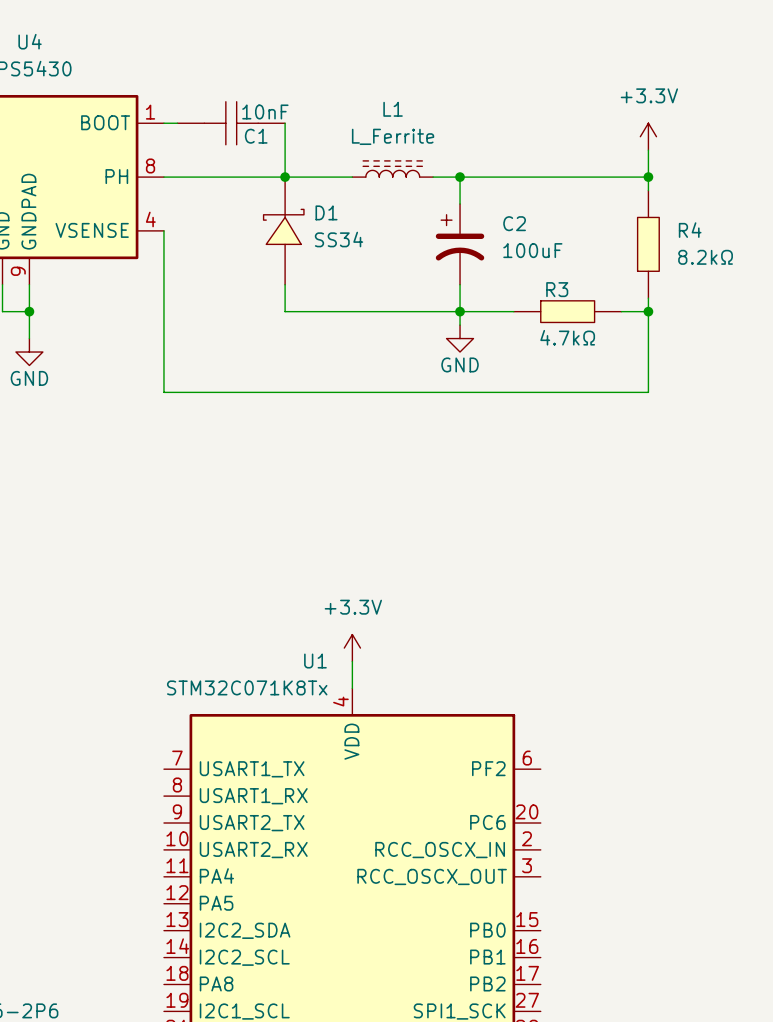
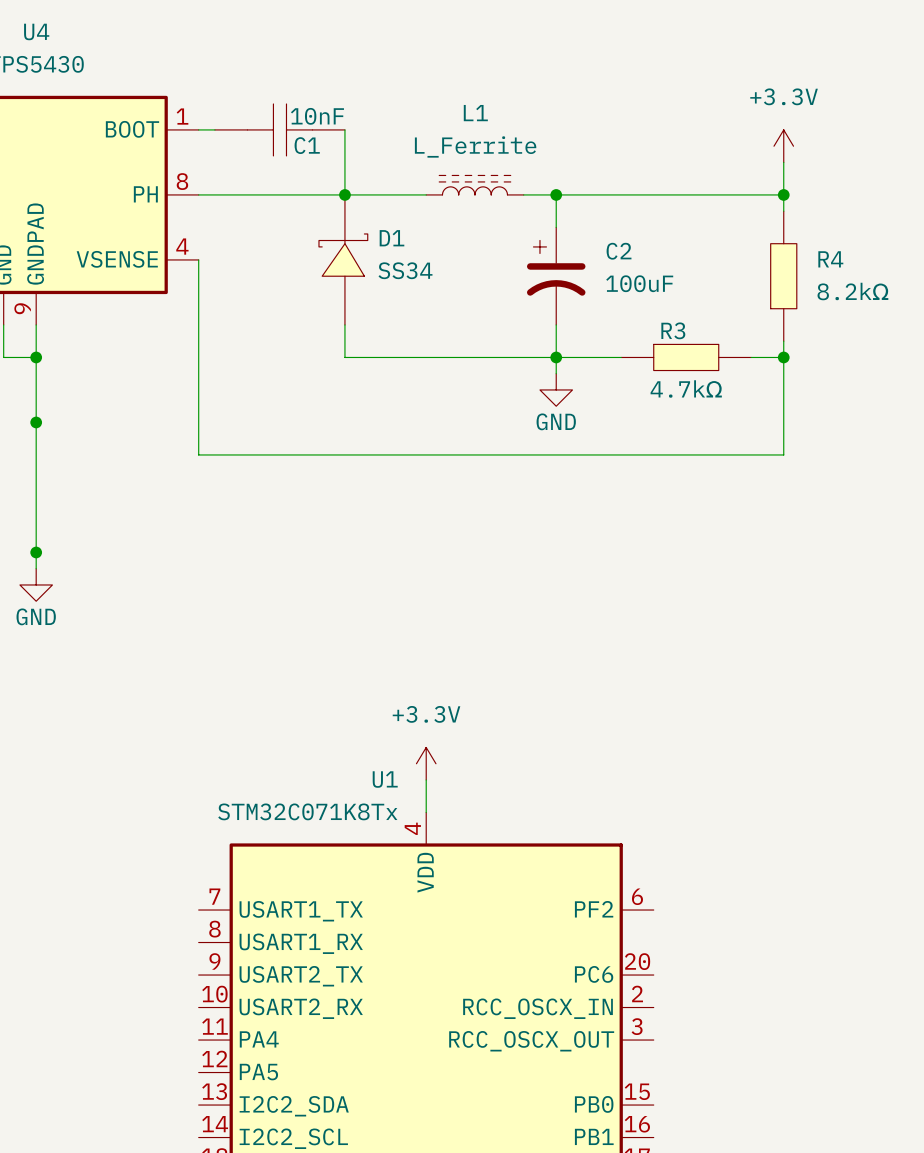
wire: none -> (36, 389) (36, 568)
power symbol position: GND (29, 352) -> GND (36, 584)
junction: none -> (36, 422)
junction: none -> (36, 552)

